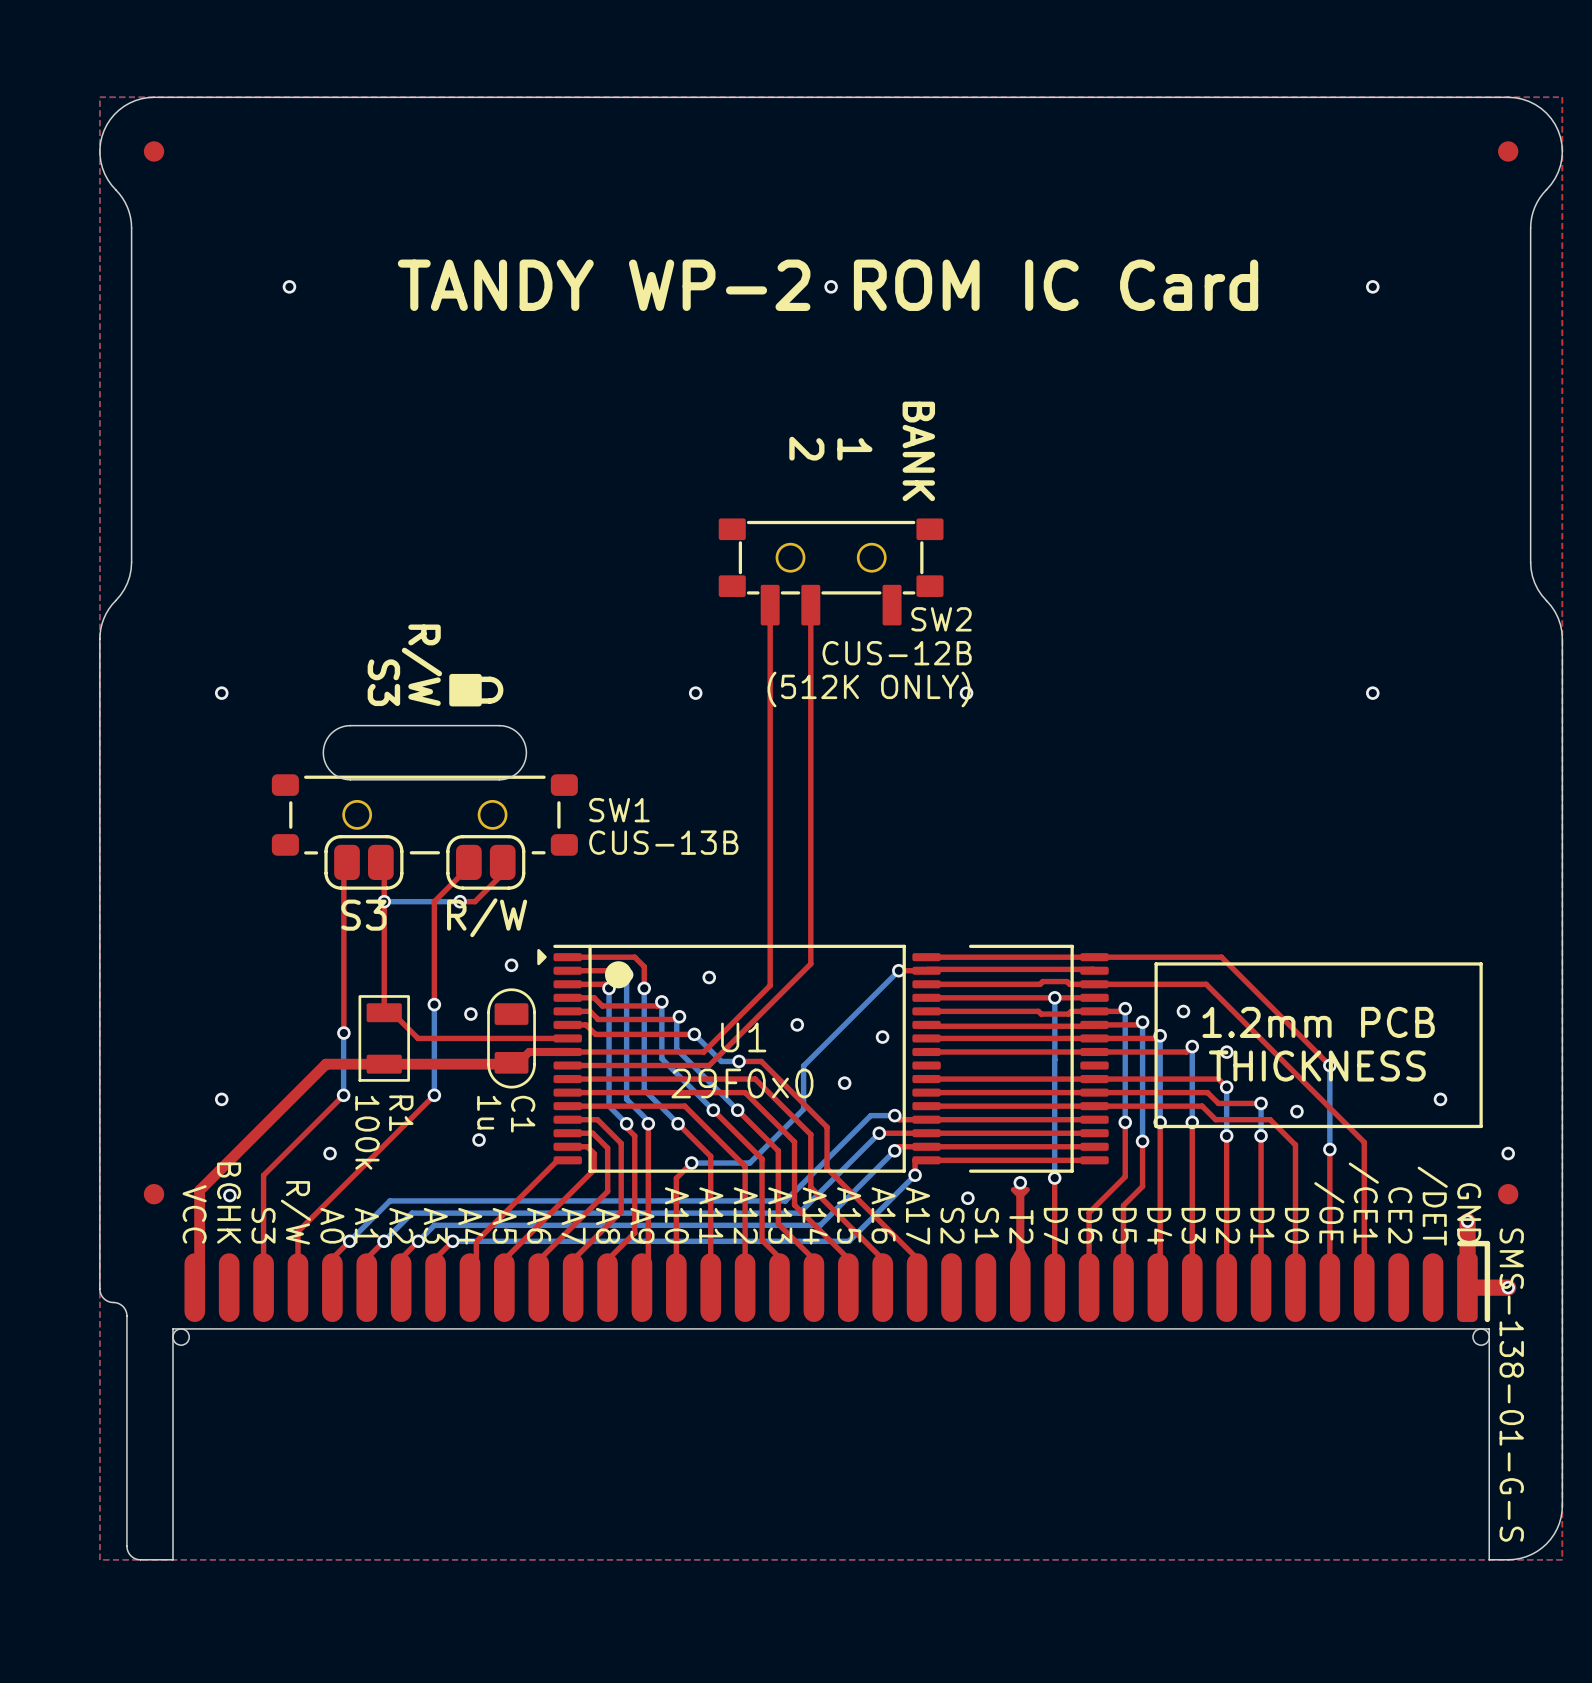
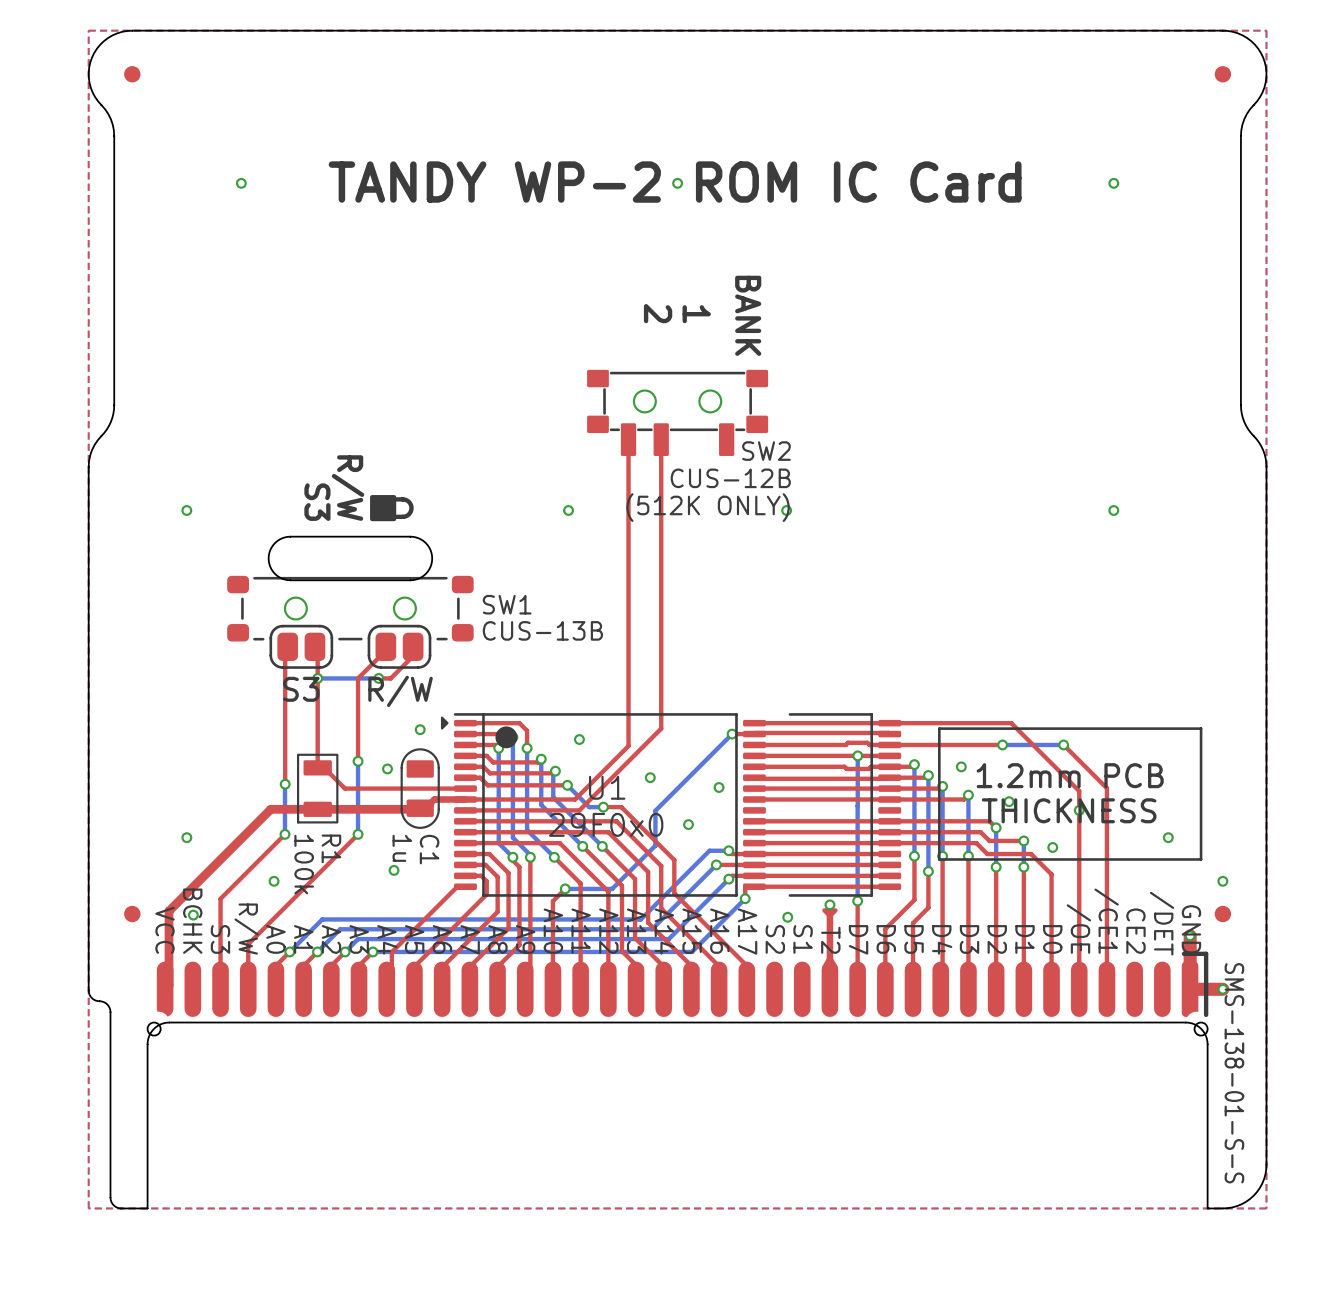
board edge: (154, 97) (1508, 97) (1528, 101) (1546, 113) (1558, 130) (1562, 151) (1558, 172) (1537, 202) (1530, 222) (1530, 562) (1532, 576) (1537, 589) (1558, 618) (1562, 638) (1562, 1505) (1557, 1529) (1546, 1543) (1531, 1554) (1520, 1558) (1489, 1559) (1489, 1328) (172, 1328) (172, 1559) (138, 1559) (130, 1555) (126, 1546) (126, 1314) (121, 1305) (103, 1298) (99, 1288) (99, 638) (103, 618) (124, 589) (131, 569) (131, 228) (130, 217) (125, 202) (104, 174) (99, 149) (103, 130) (114, 114) (129, 103) (154, 97) -> none
part: none -> (677, 619)
top track: (1221, 957) (1329, 1065) -> (992, 723) (1011, 723) (1079, 791) (1079, 878)
top track: (1206, 984) (1364, 1142) -> (1063, 744) (1106, 788) (1106, 872)
top track: none -> (979, 744) (1002, 744)
bottom track: none -> (1002, 744) (1063, 744)
via: none -> (1002, 744)
via: none -> (1063, 744)
via position: (1226, 1052) -> (1009, 801)
bottom track: (1329, 1065) (1329, 1149) -> none
via: (1329, 1149) -> none
part value: SMS-138-01-G-S (1511, 1385) -> SMS-138-01-S-S (1234, 1073)

